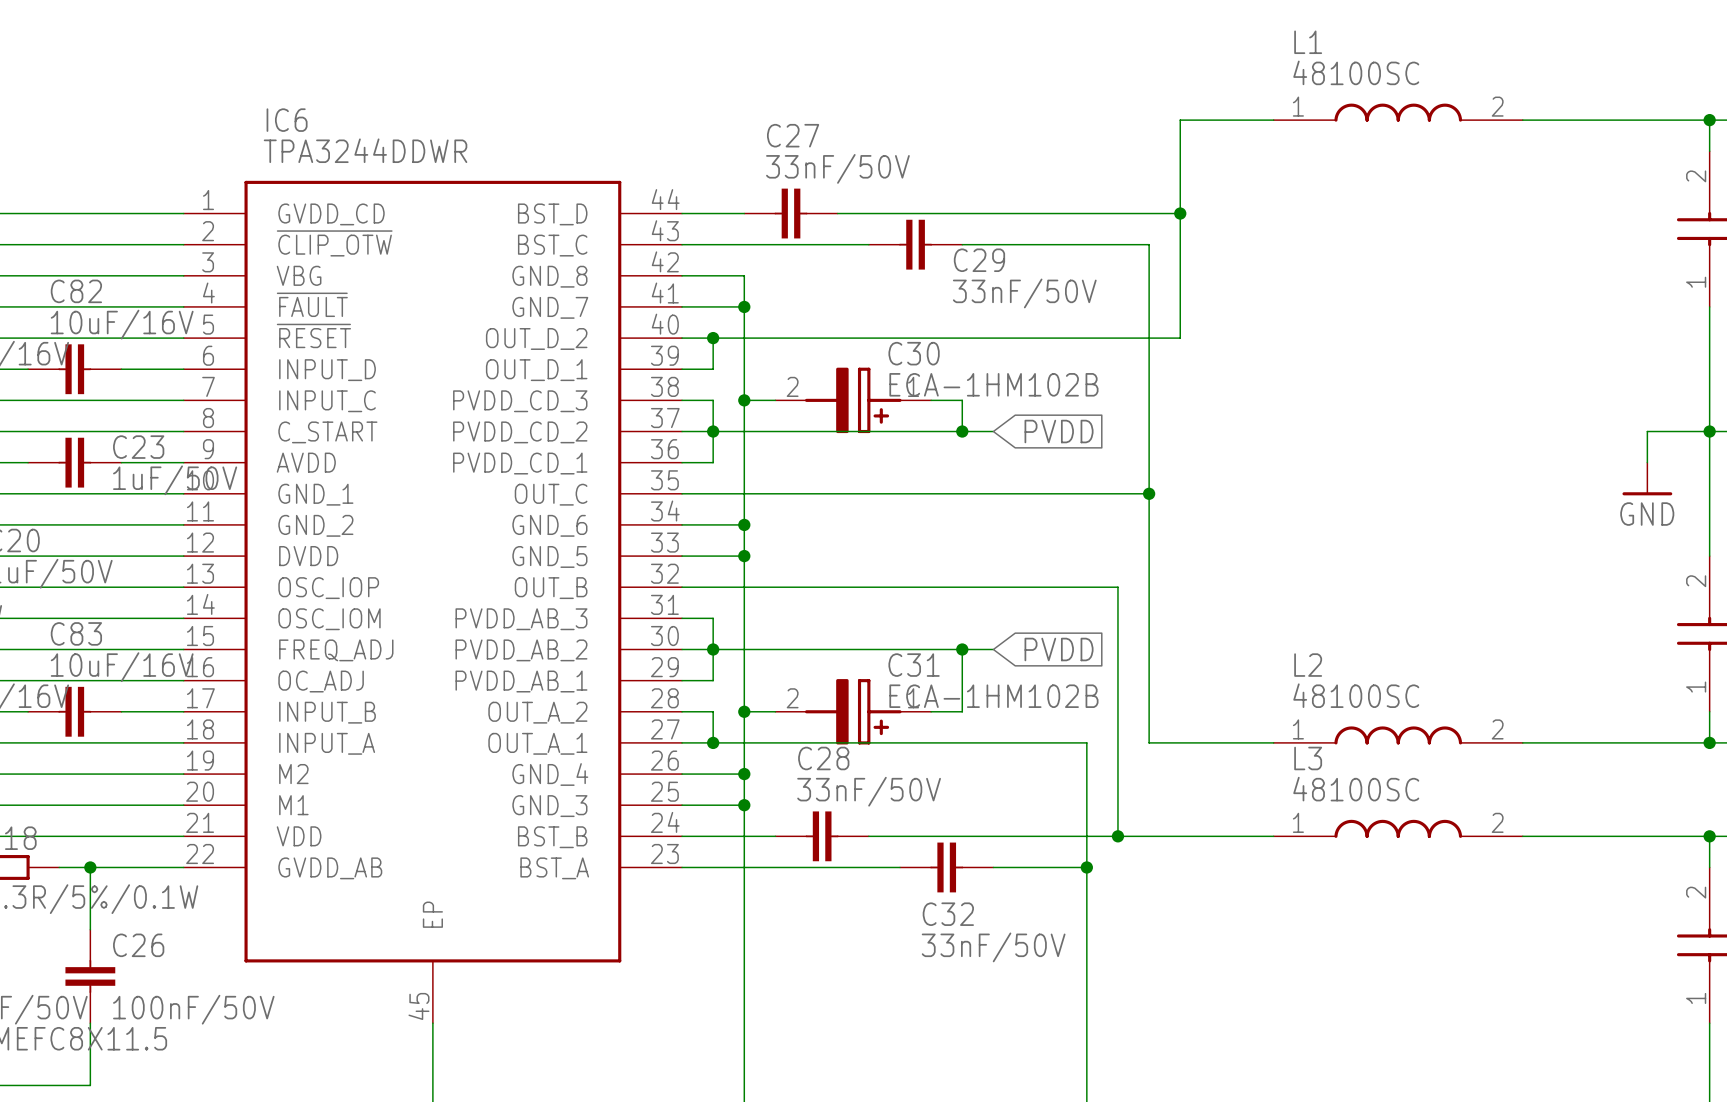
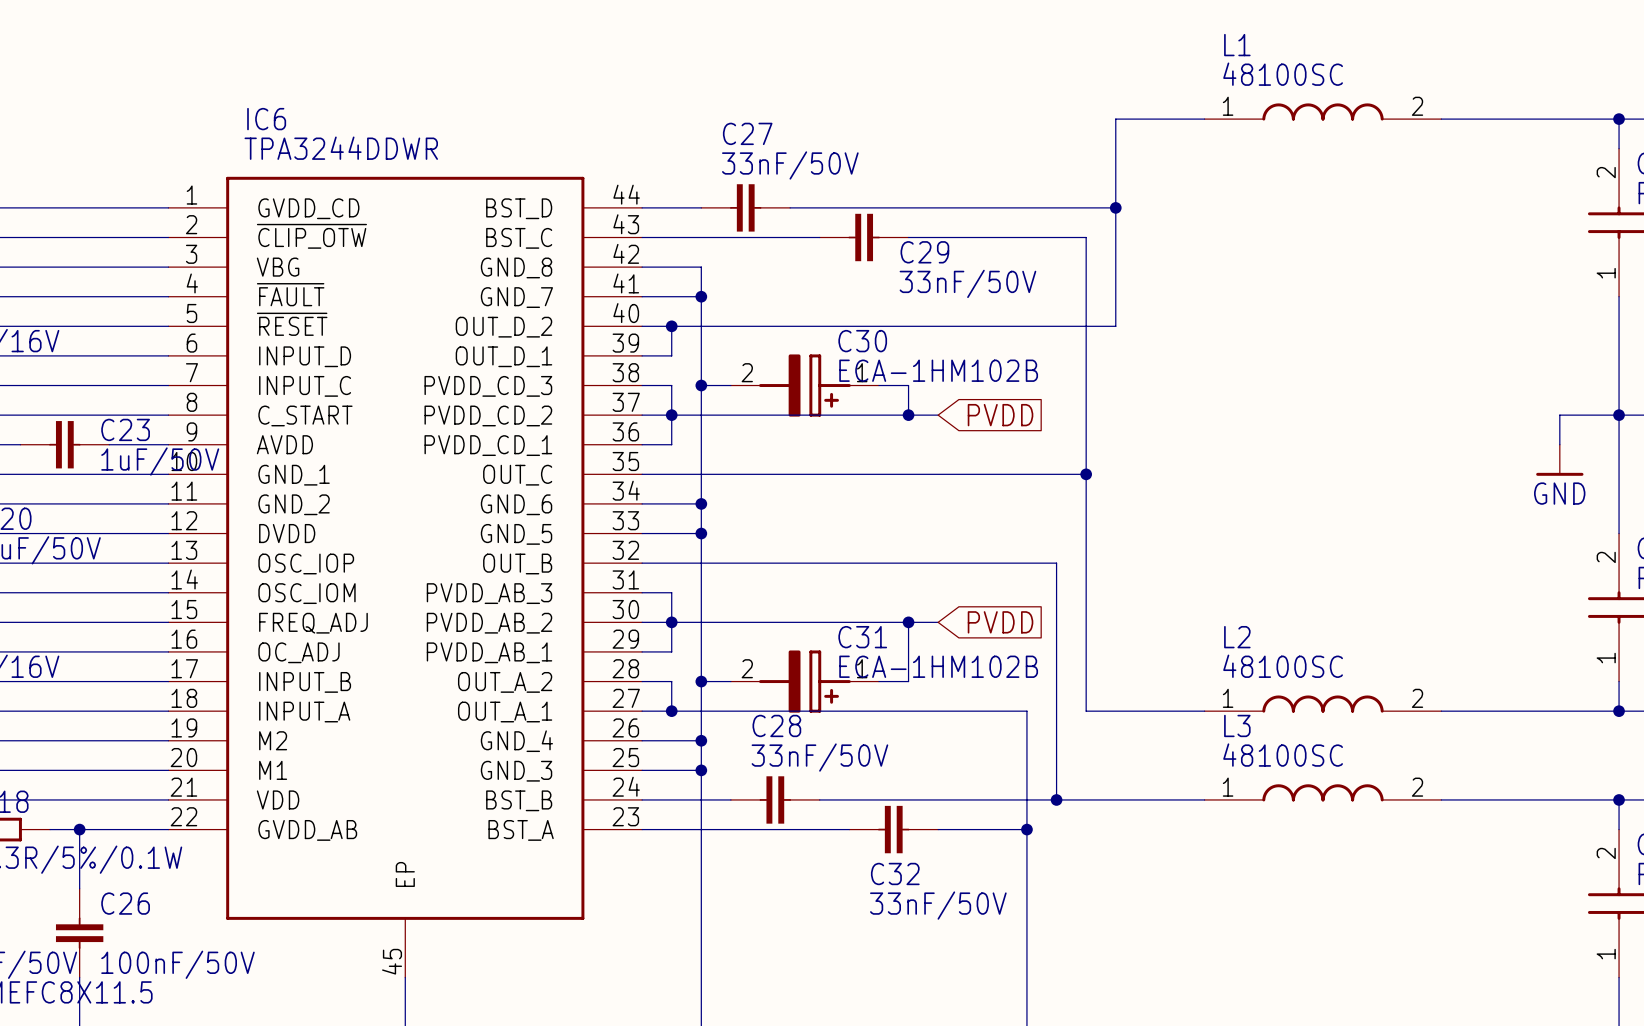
C82: 10uF/16V (74, 369) -> none
C83: 10uF/16V (74, 711) -> none

